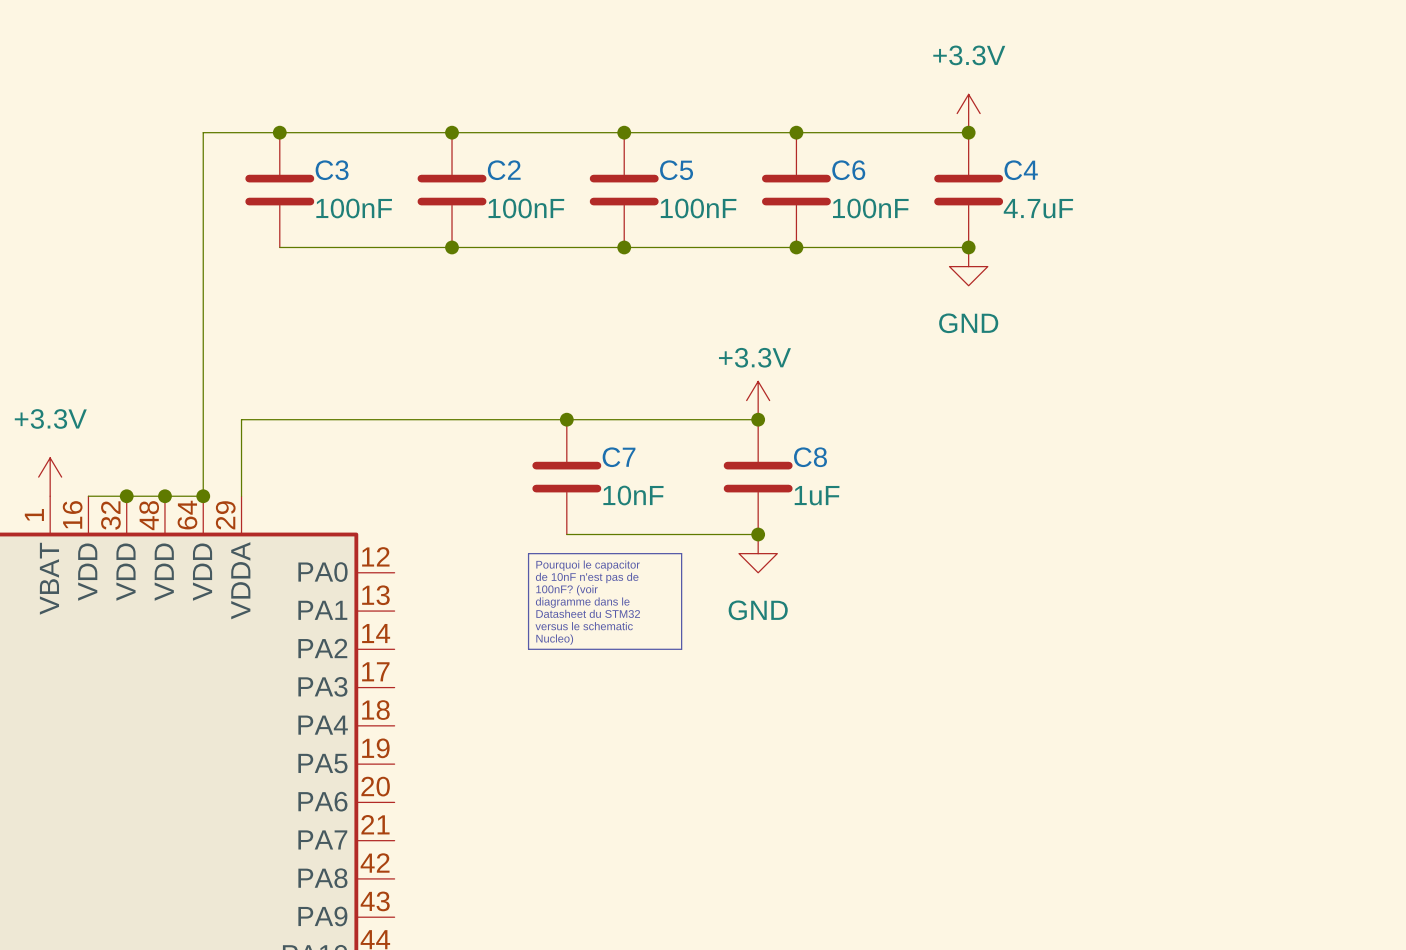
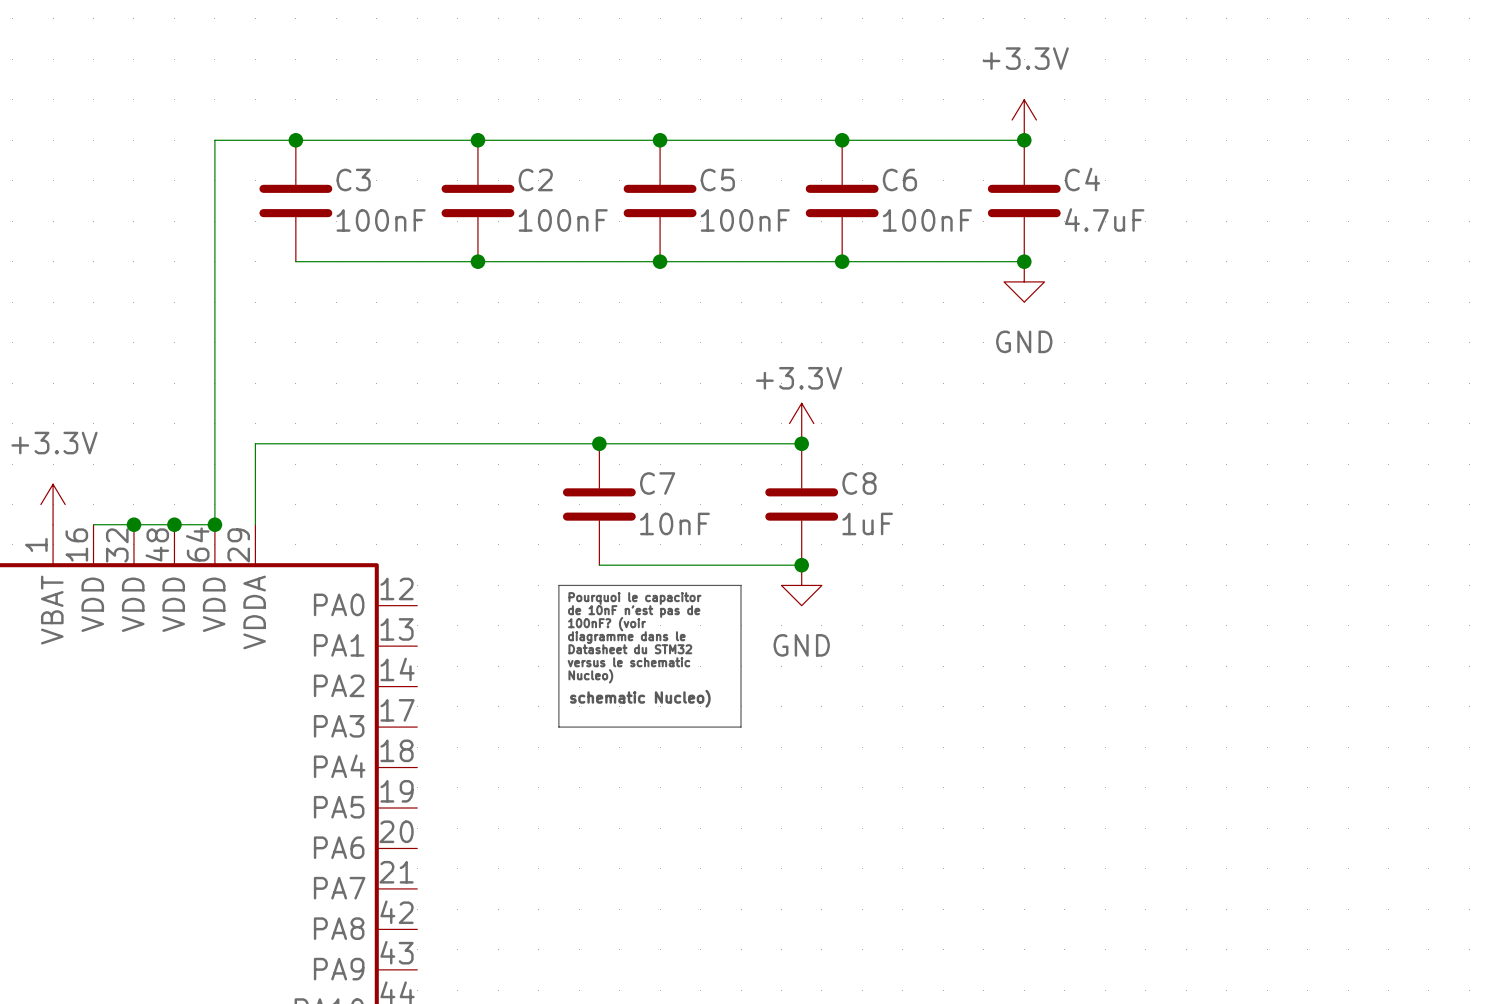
line: (681, 553) (681, 649) (528, 649) -> (720, 585) (741, 585) (741, 727) (558, 727) (558, 686)
text: none -> schematic Nucleo) (640, 698)

